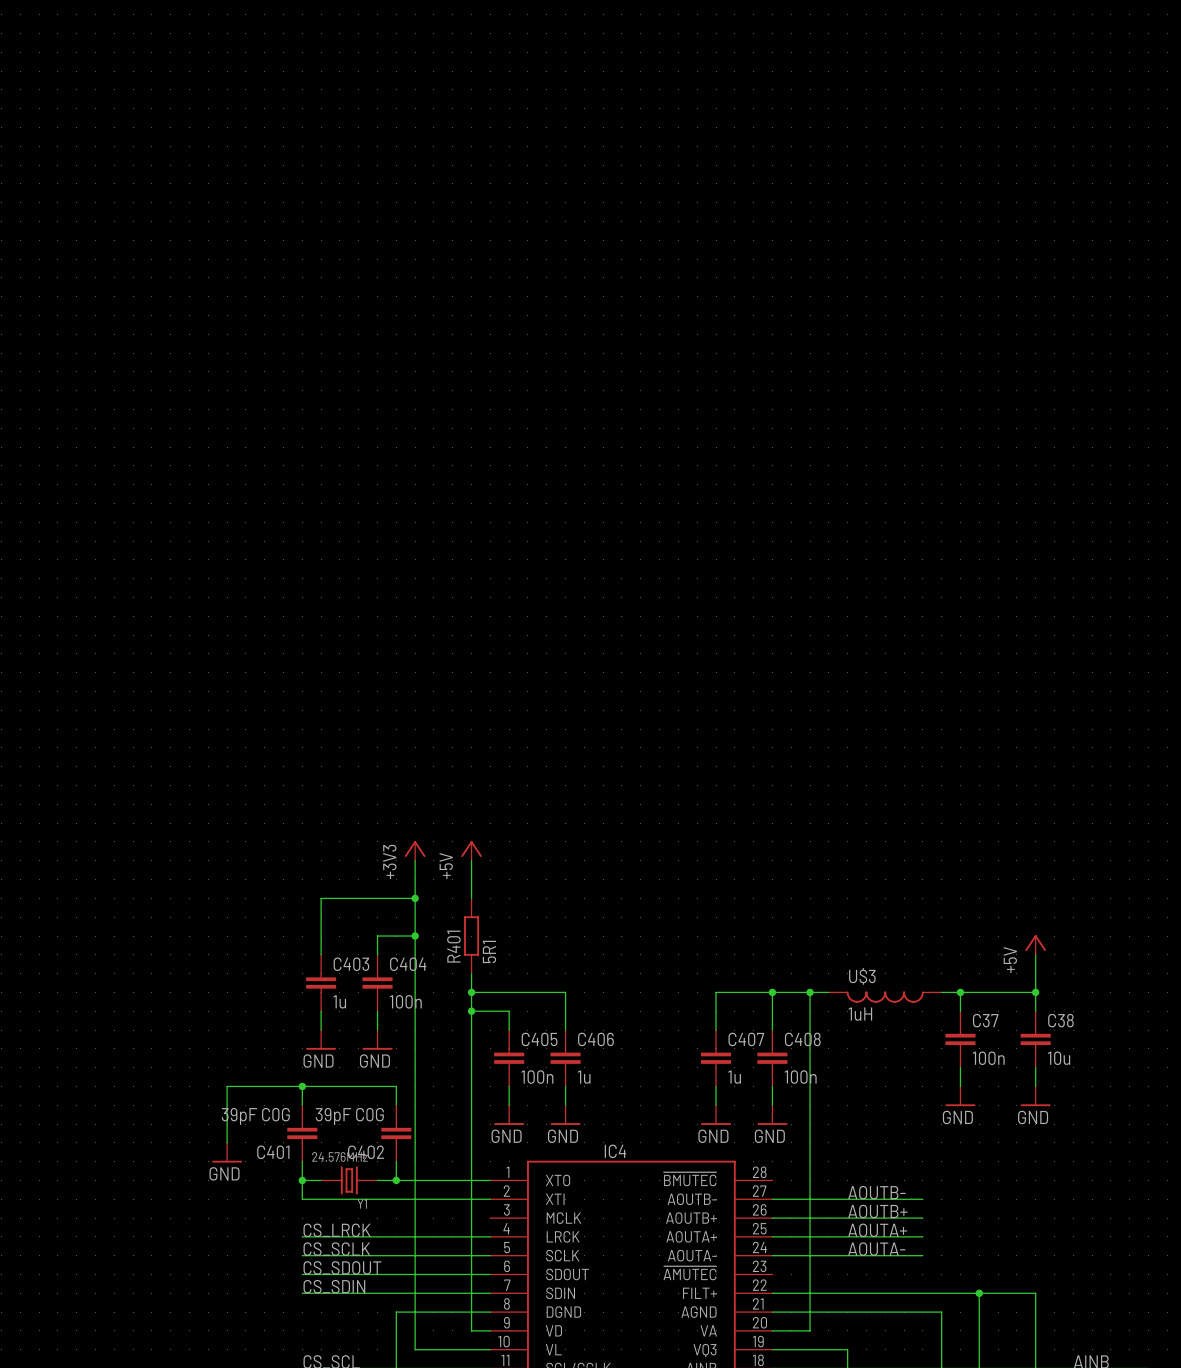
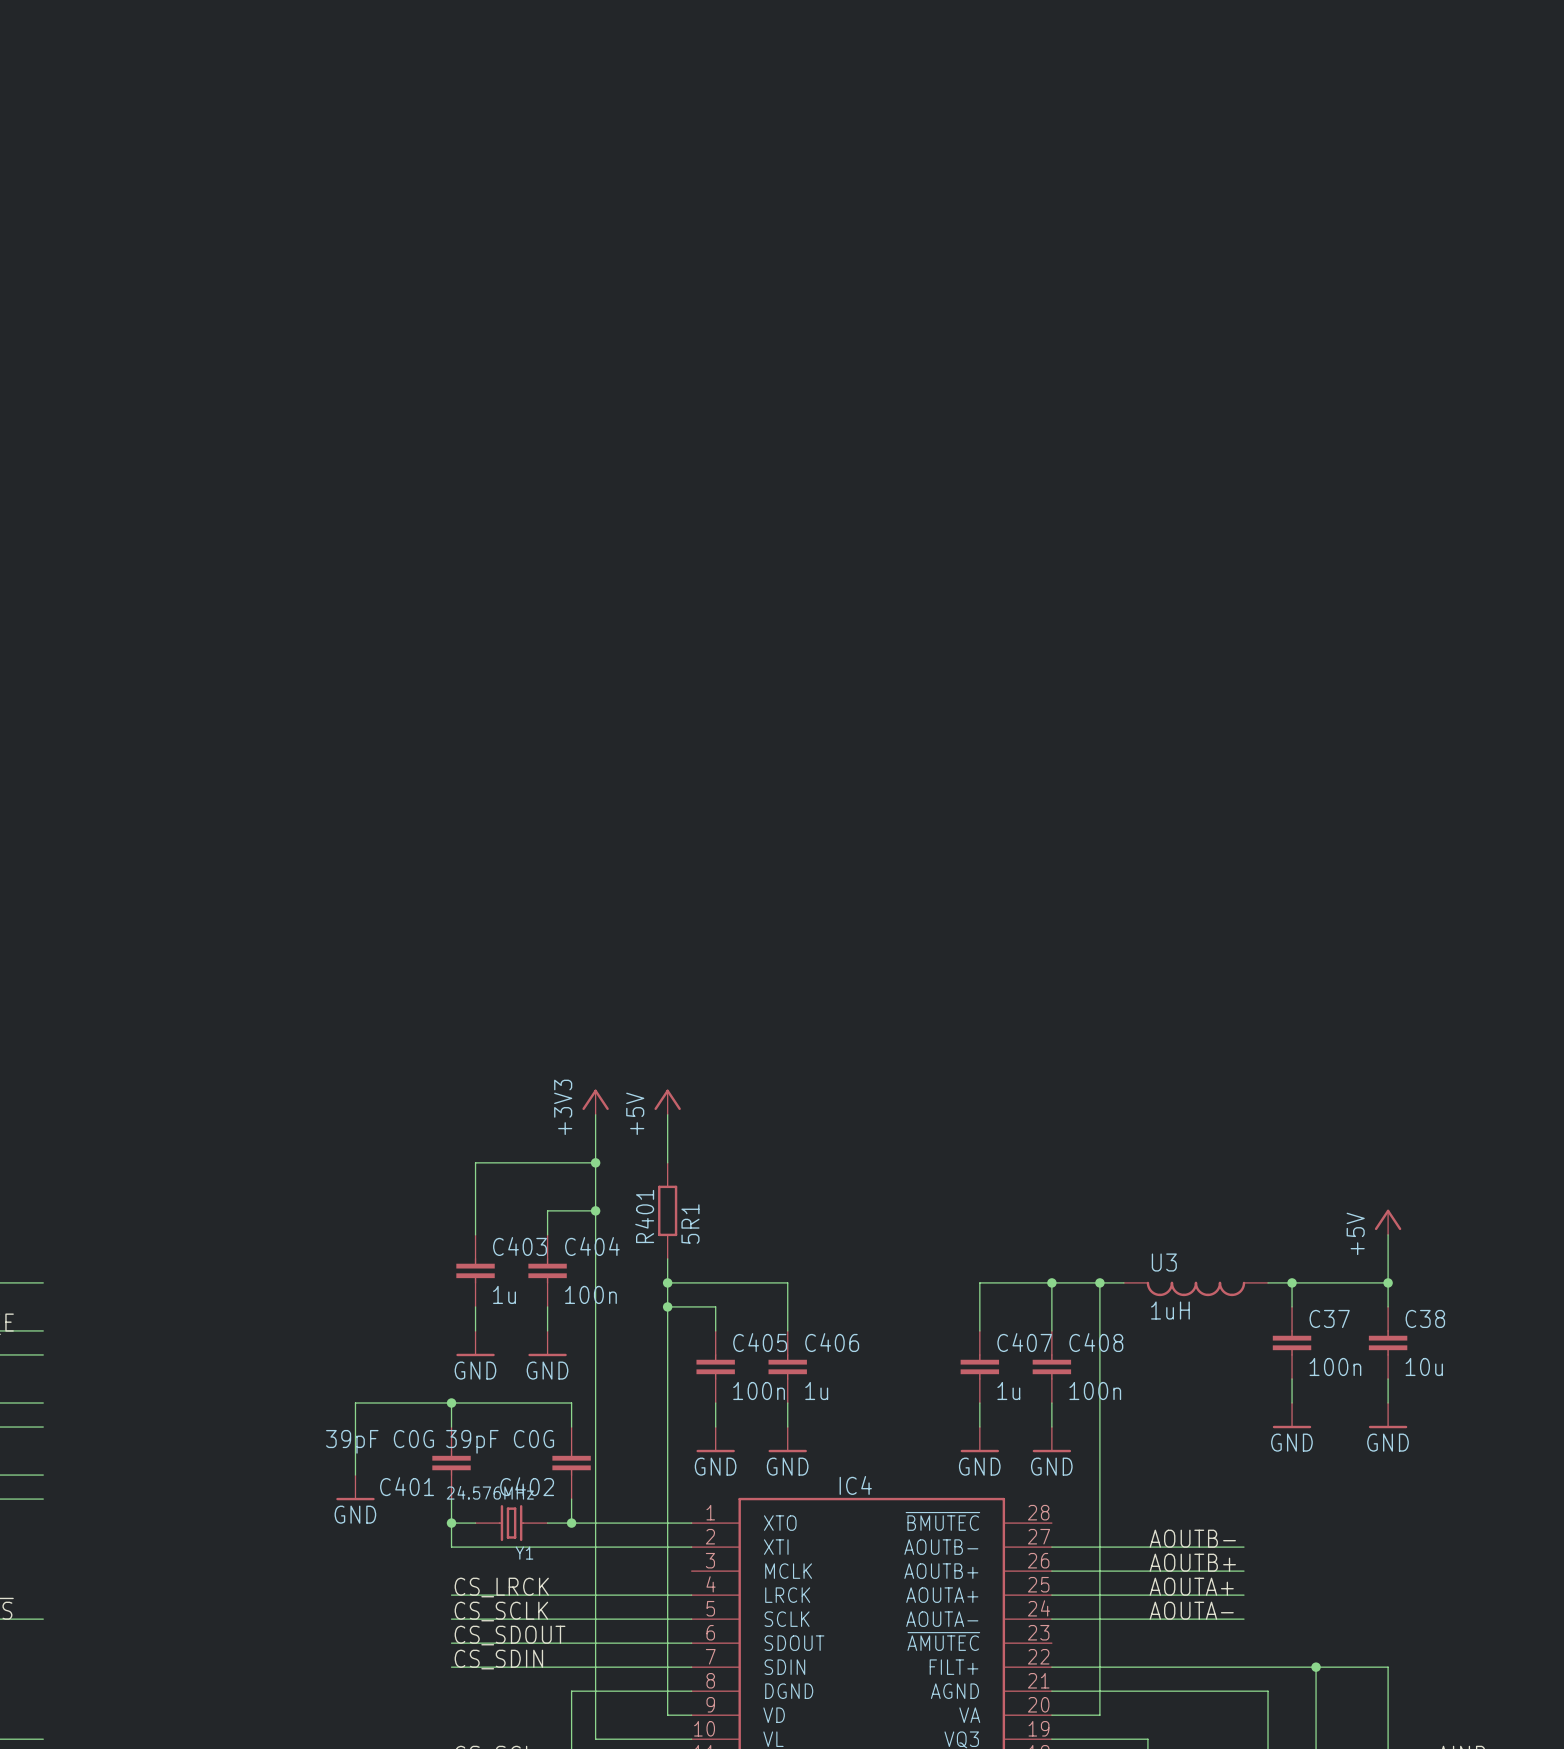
U$3 name: U$3 (862, 976) -> U3 (1164, 1262)

